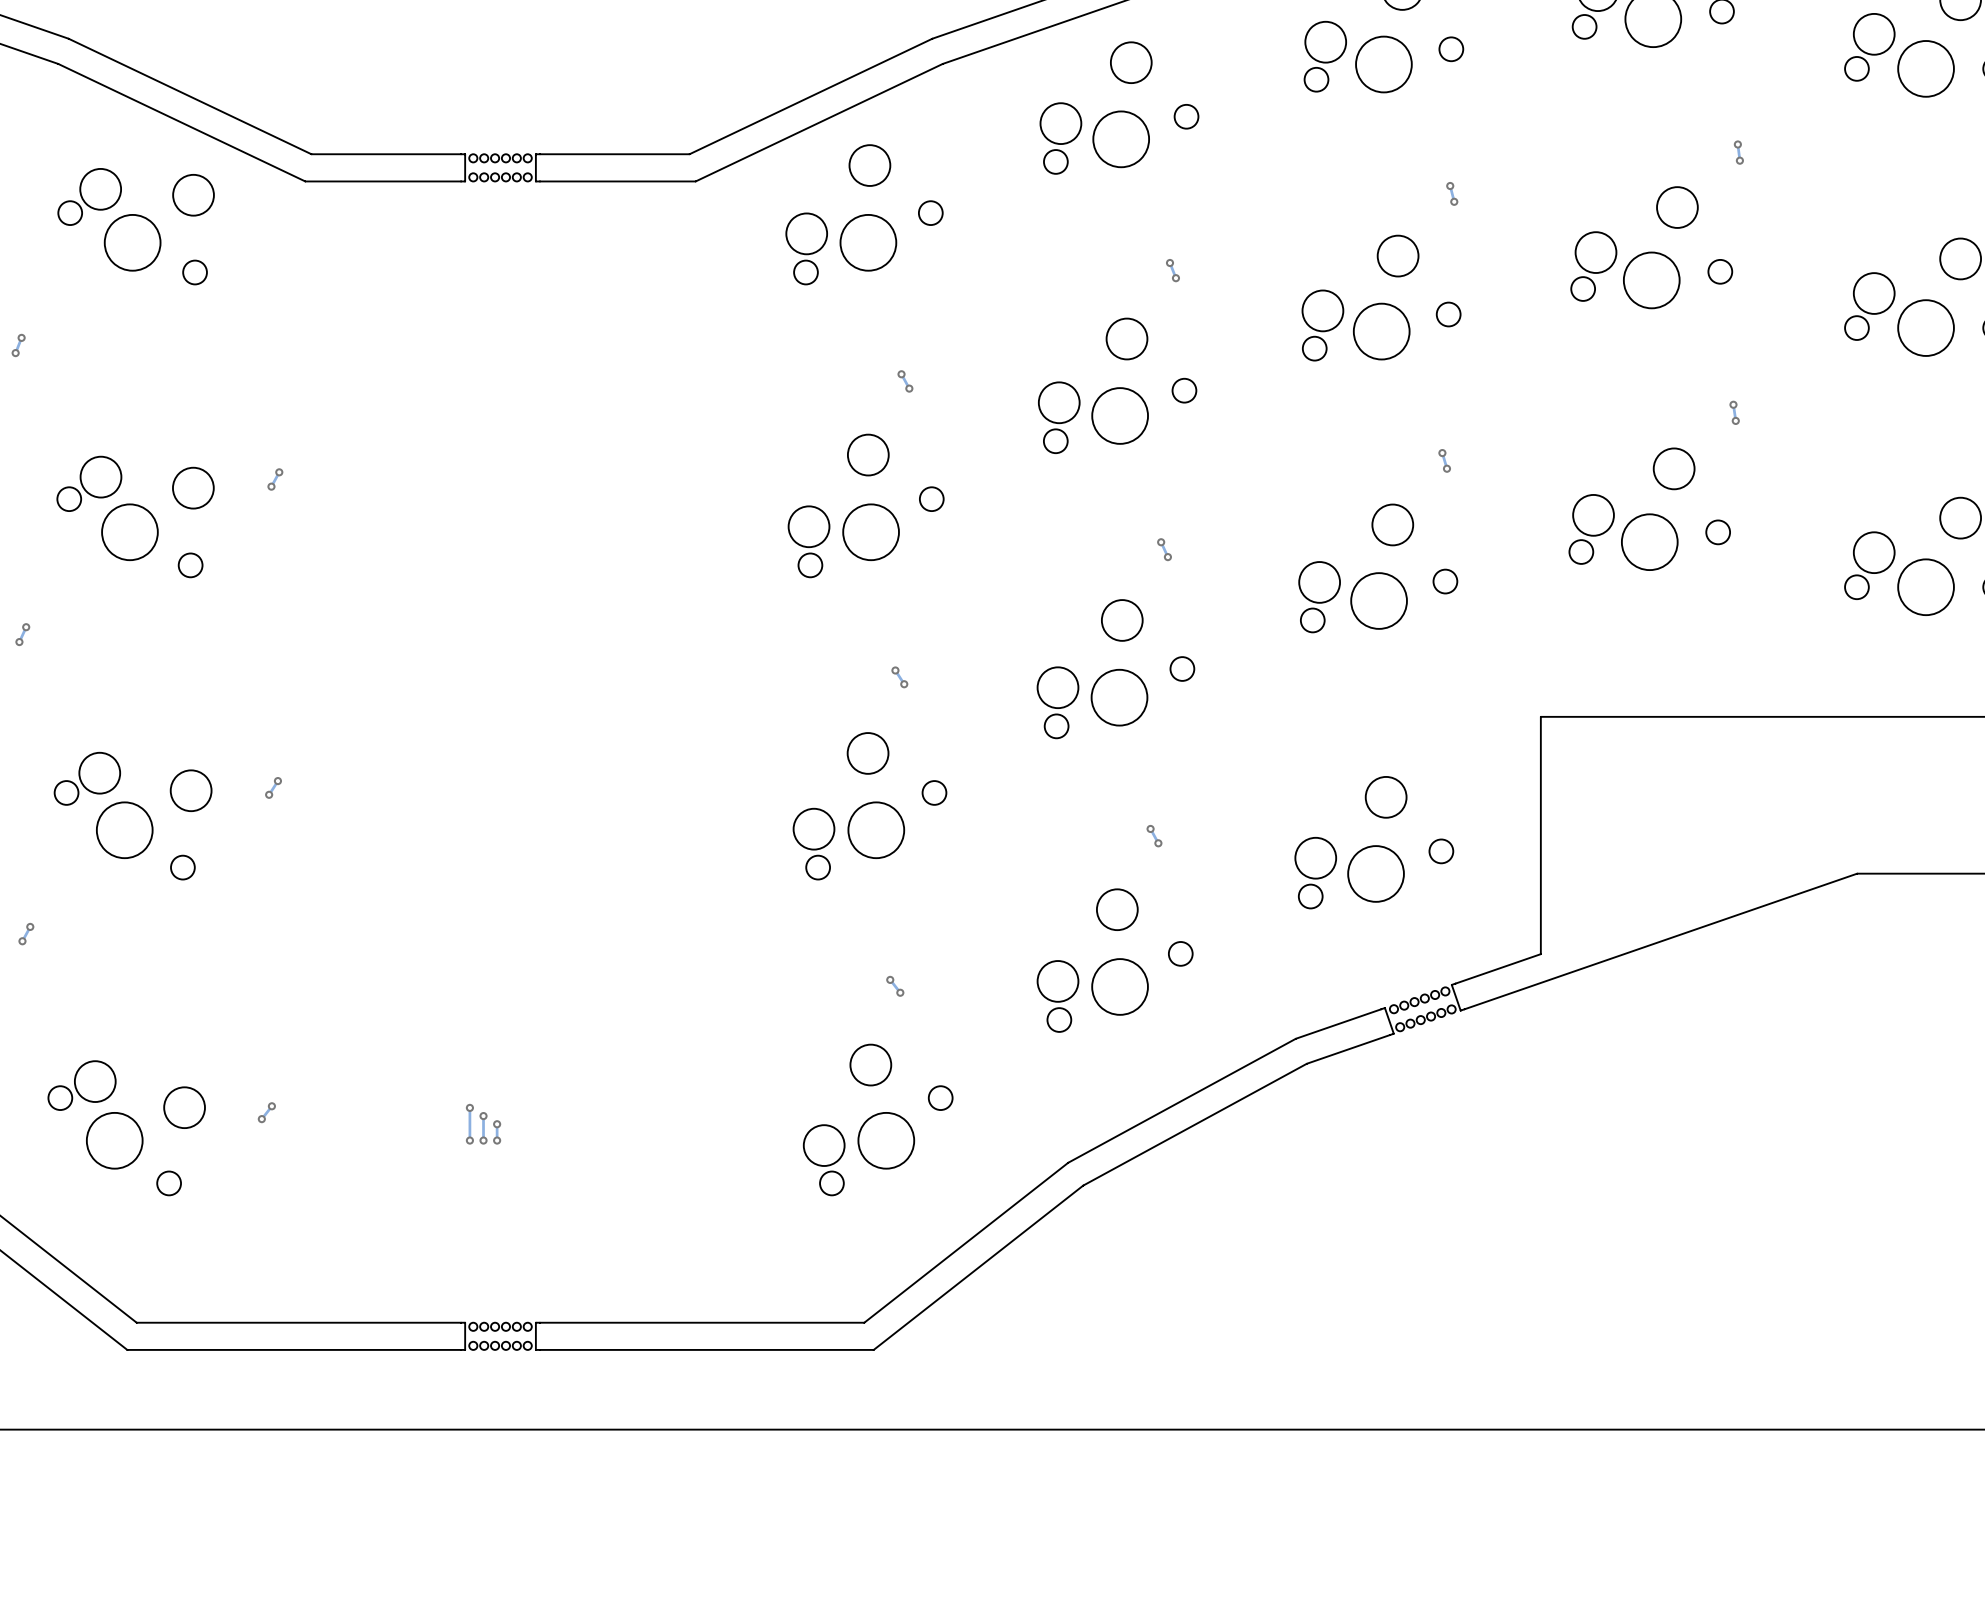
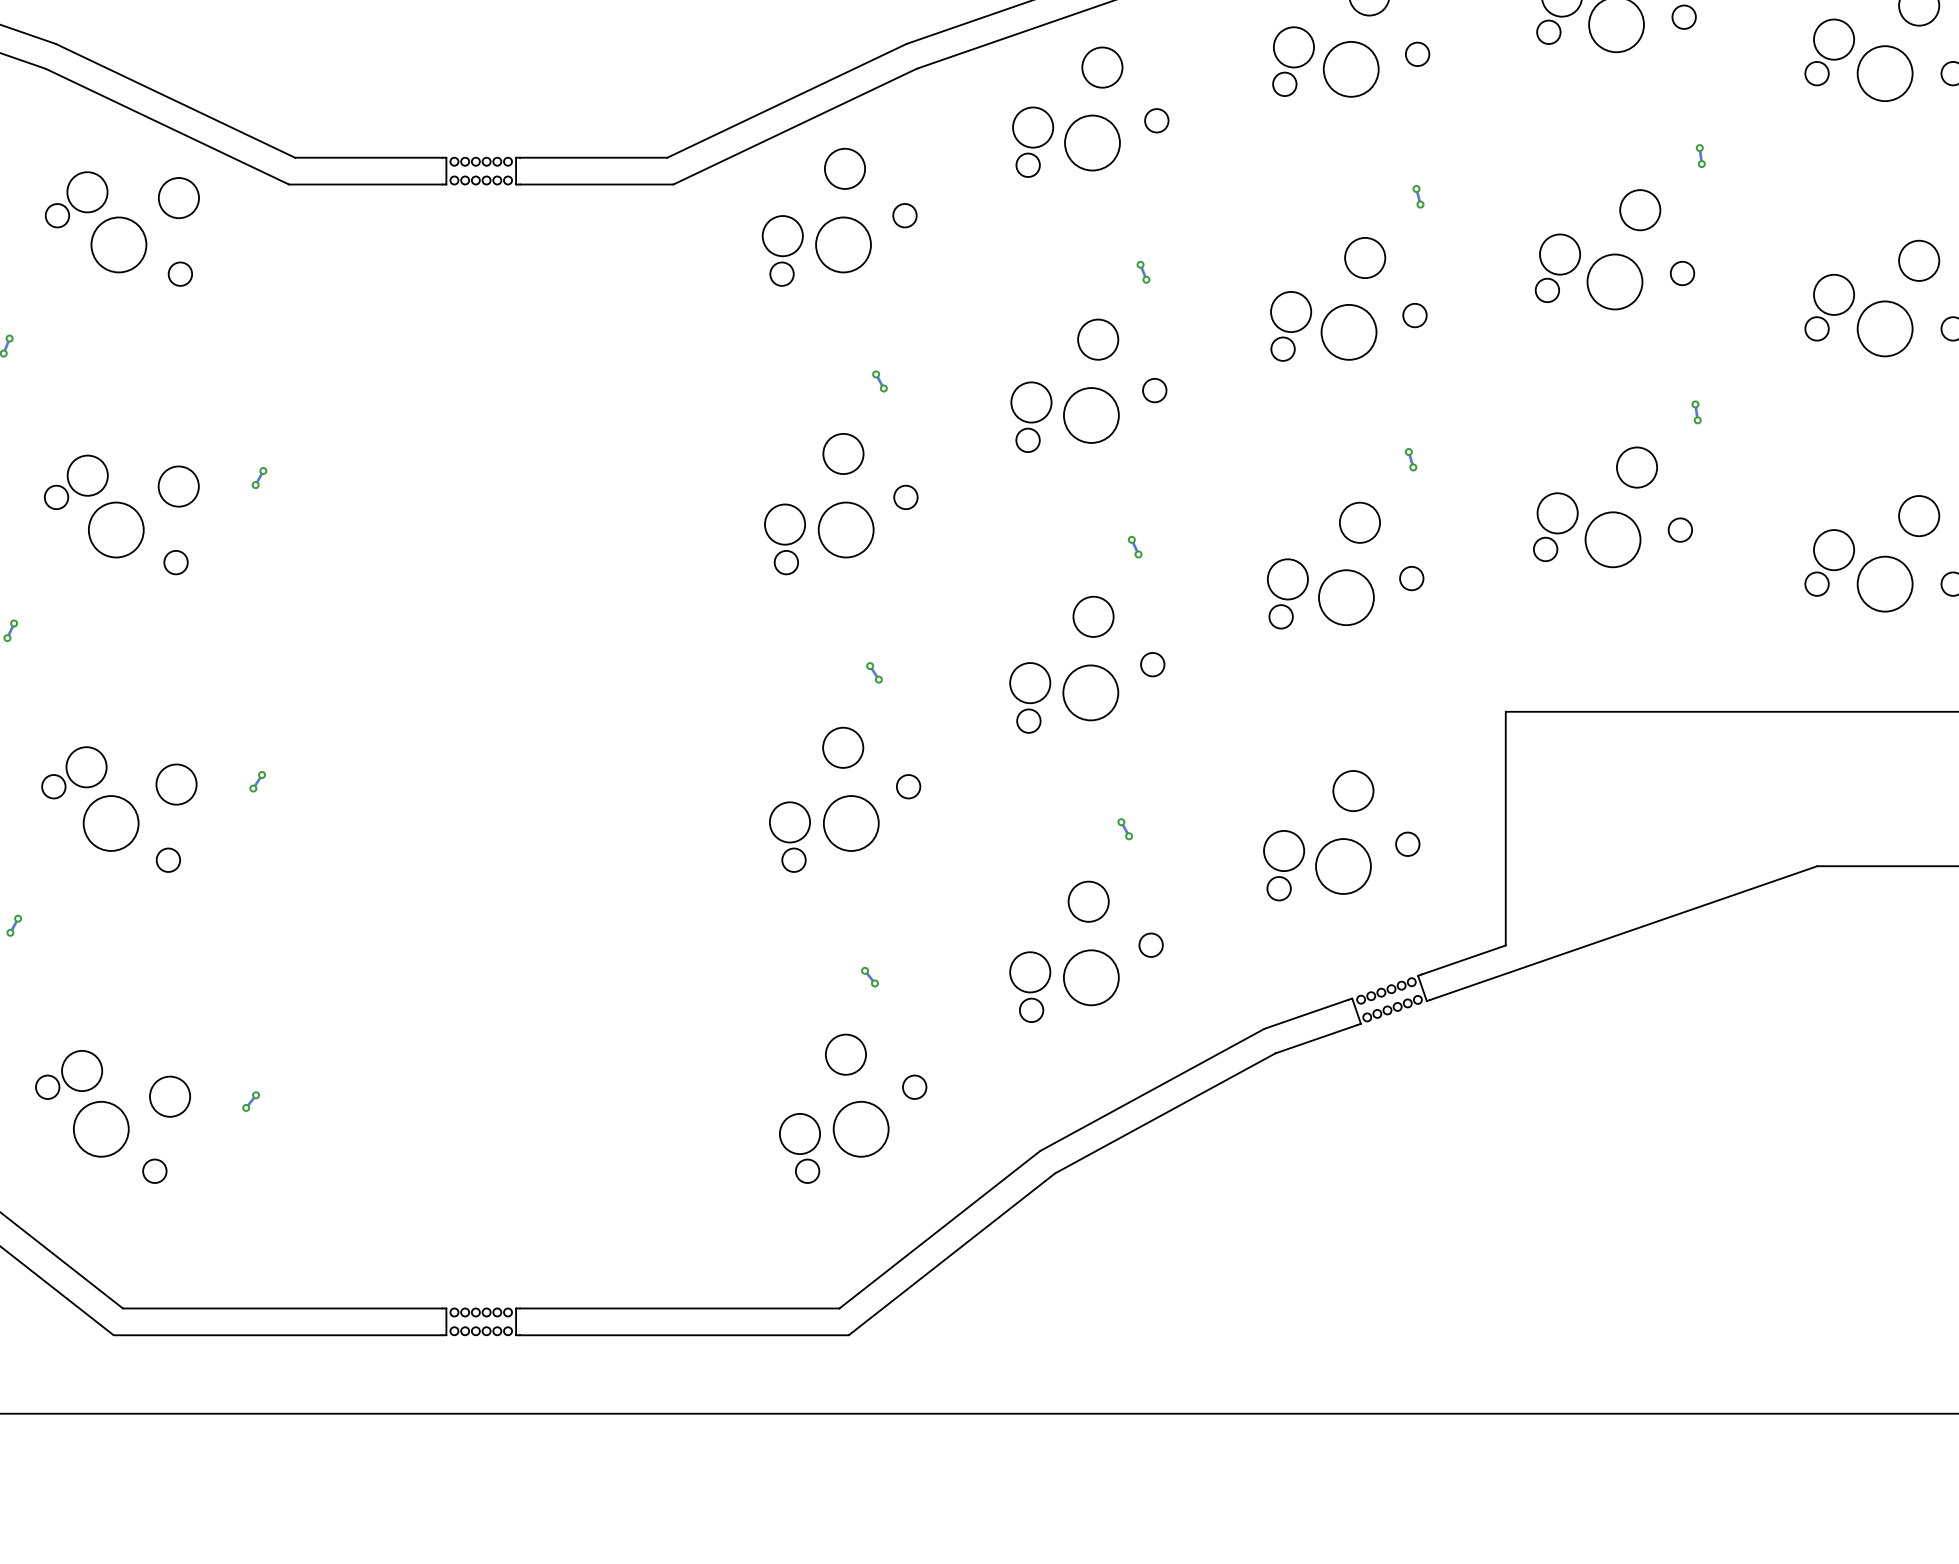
track: (469, 1107) (469, 1140) -> none
via: (469, 1107) -> none
track: (483, 1116) (483, 1140) -> none
via: (483, 1116) -> none
track: (497, 1124) (497, 1140) -> none
via: (497, 1124) -> none
via: (469, 1140) -> none
via: (483, 1140) -> none
via: (497, 1140) -> none

